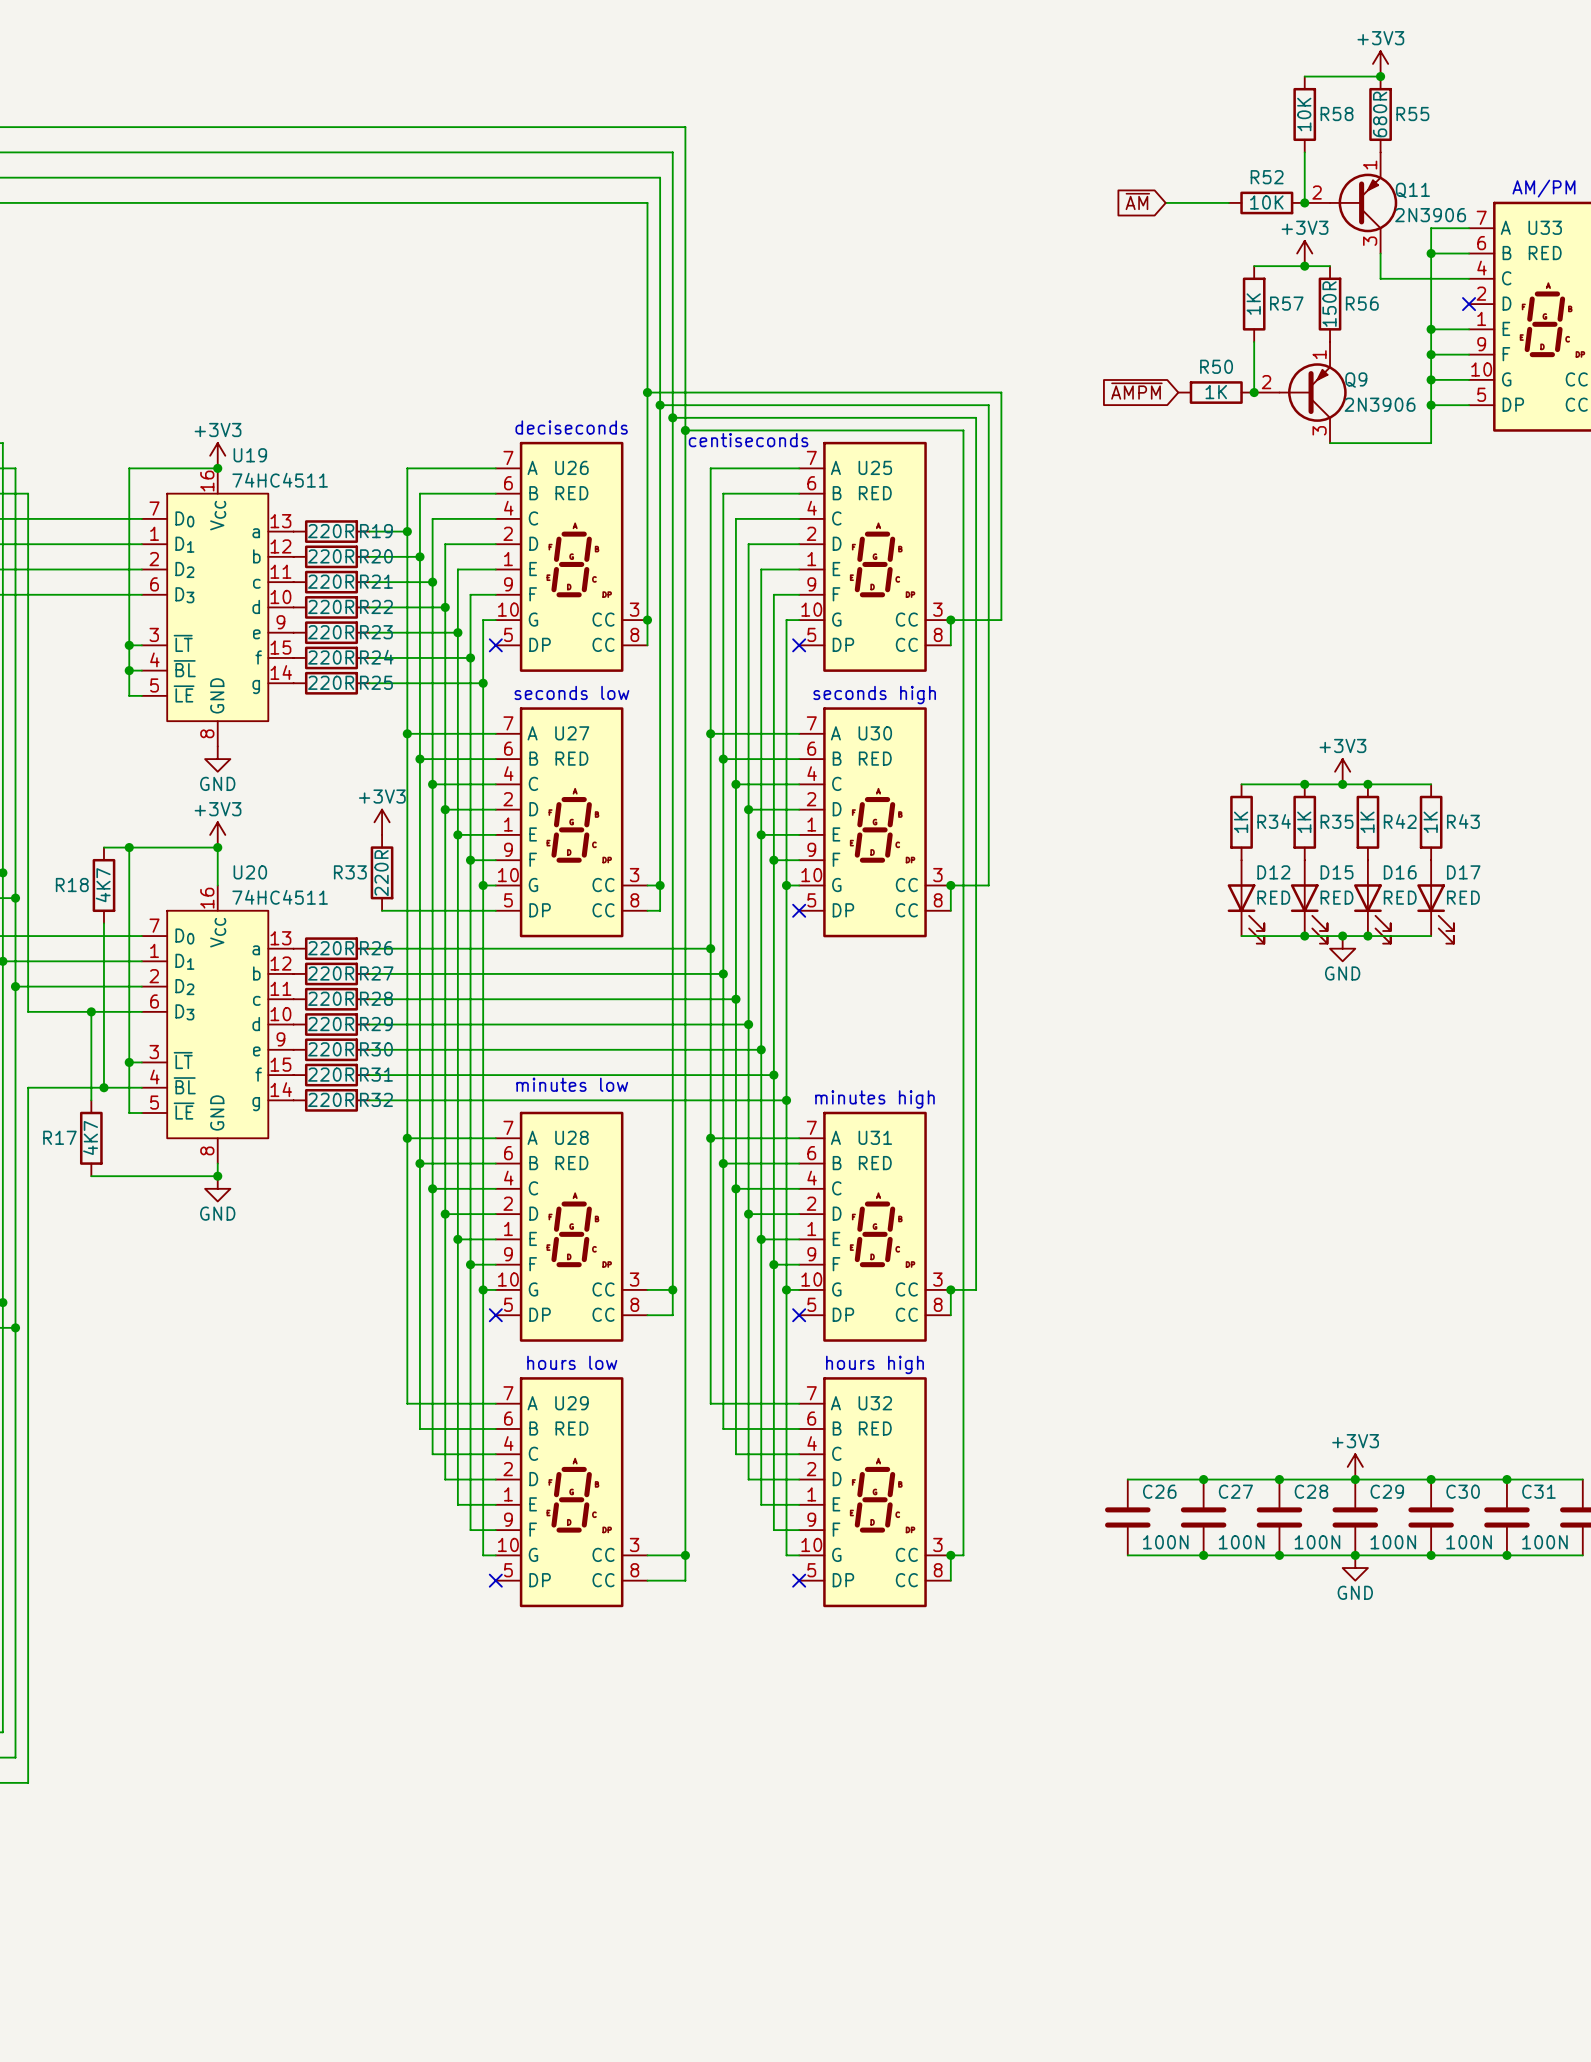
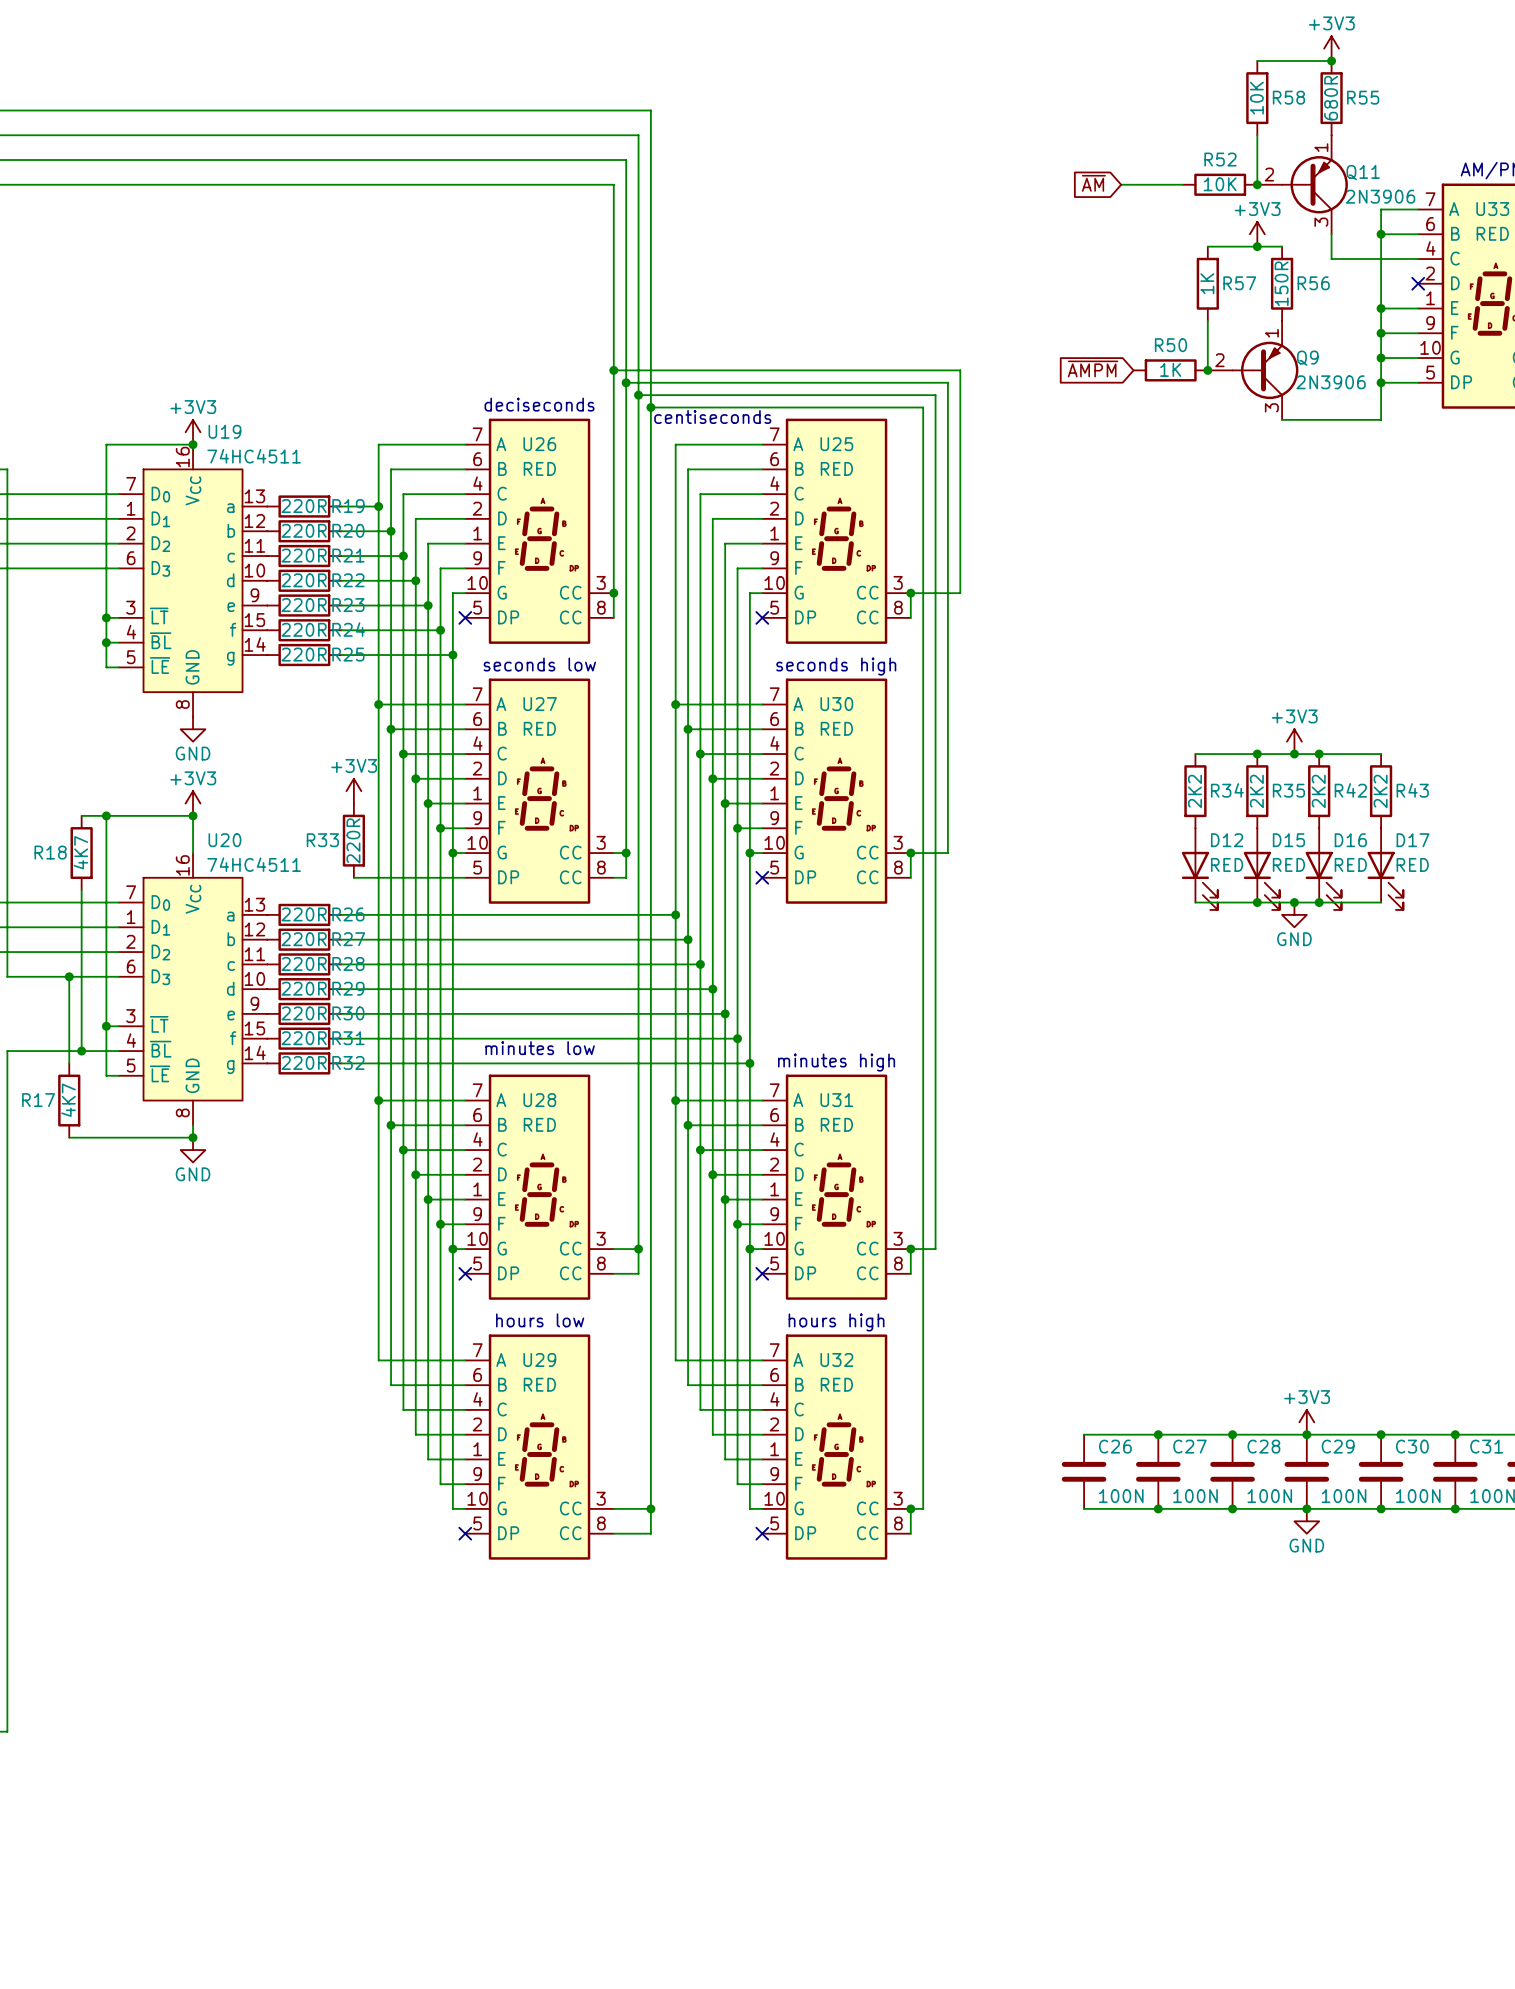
R34 value: 1K (1241, 822) -> 2K2 (1194, 791)
R35 value: 1K (1304, 822) -> 2K2 (1256, 791)
R42 value: 1K (1367, 822) -> 2K2 (1318, 791)
R43 value: 1K (1430, 822) -> 2K2 (1380, 791)

